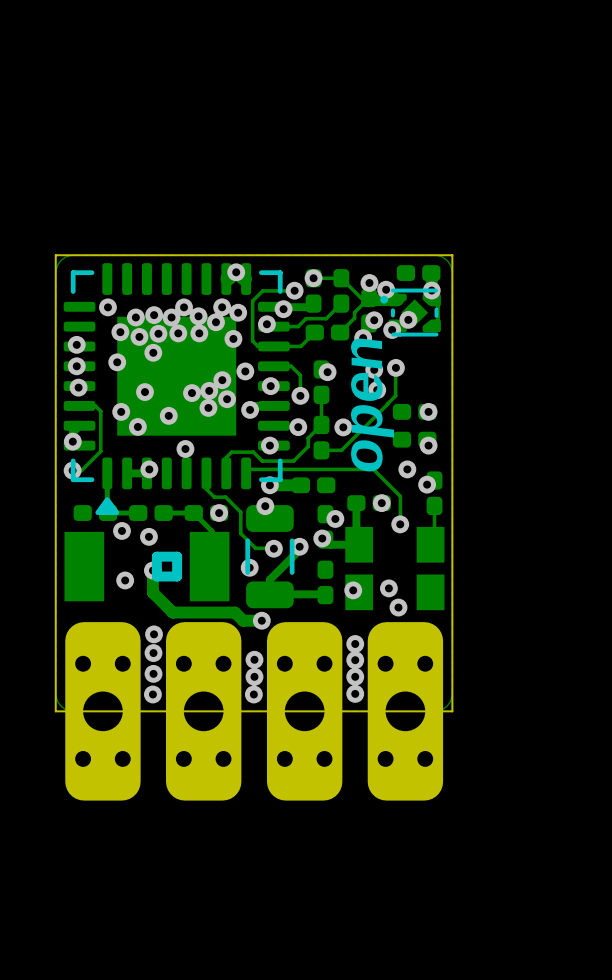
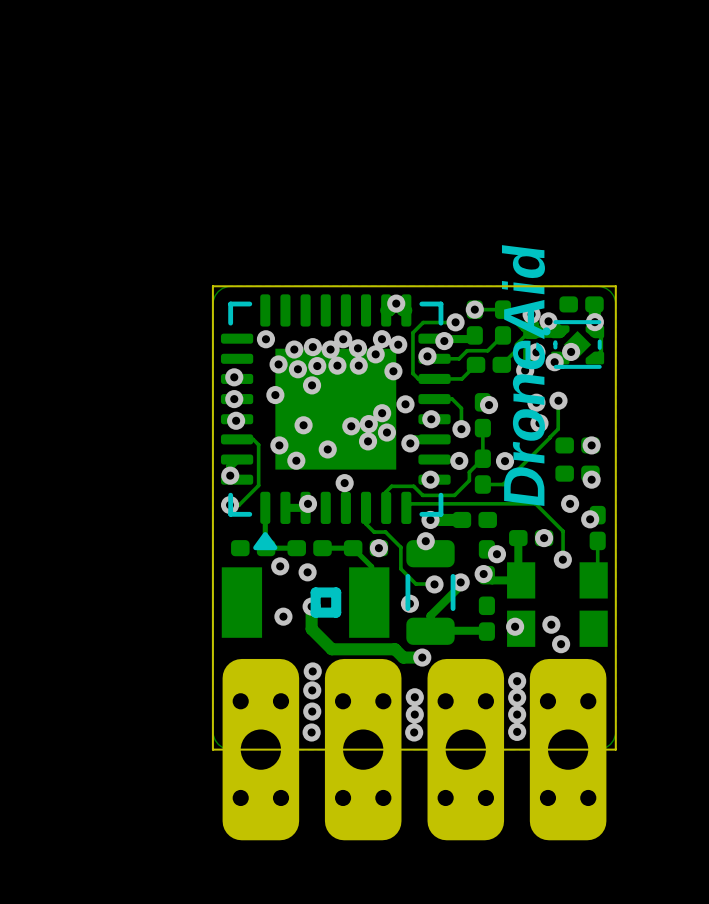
text: open (372, 405) -> DroneAid (523, 375)

